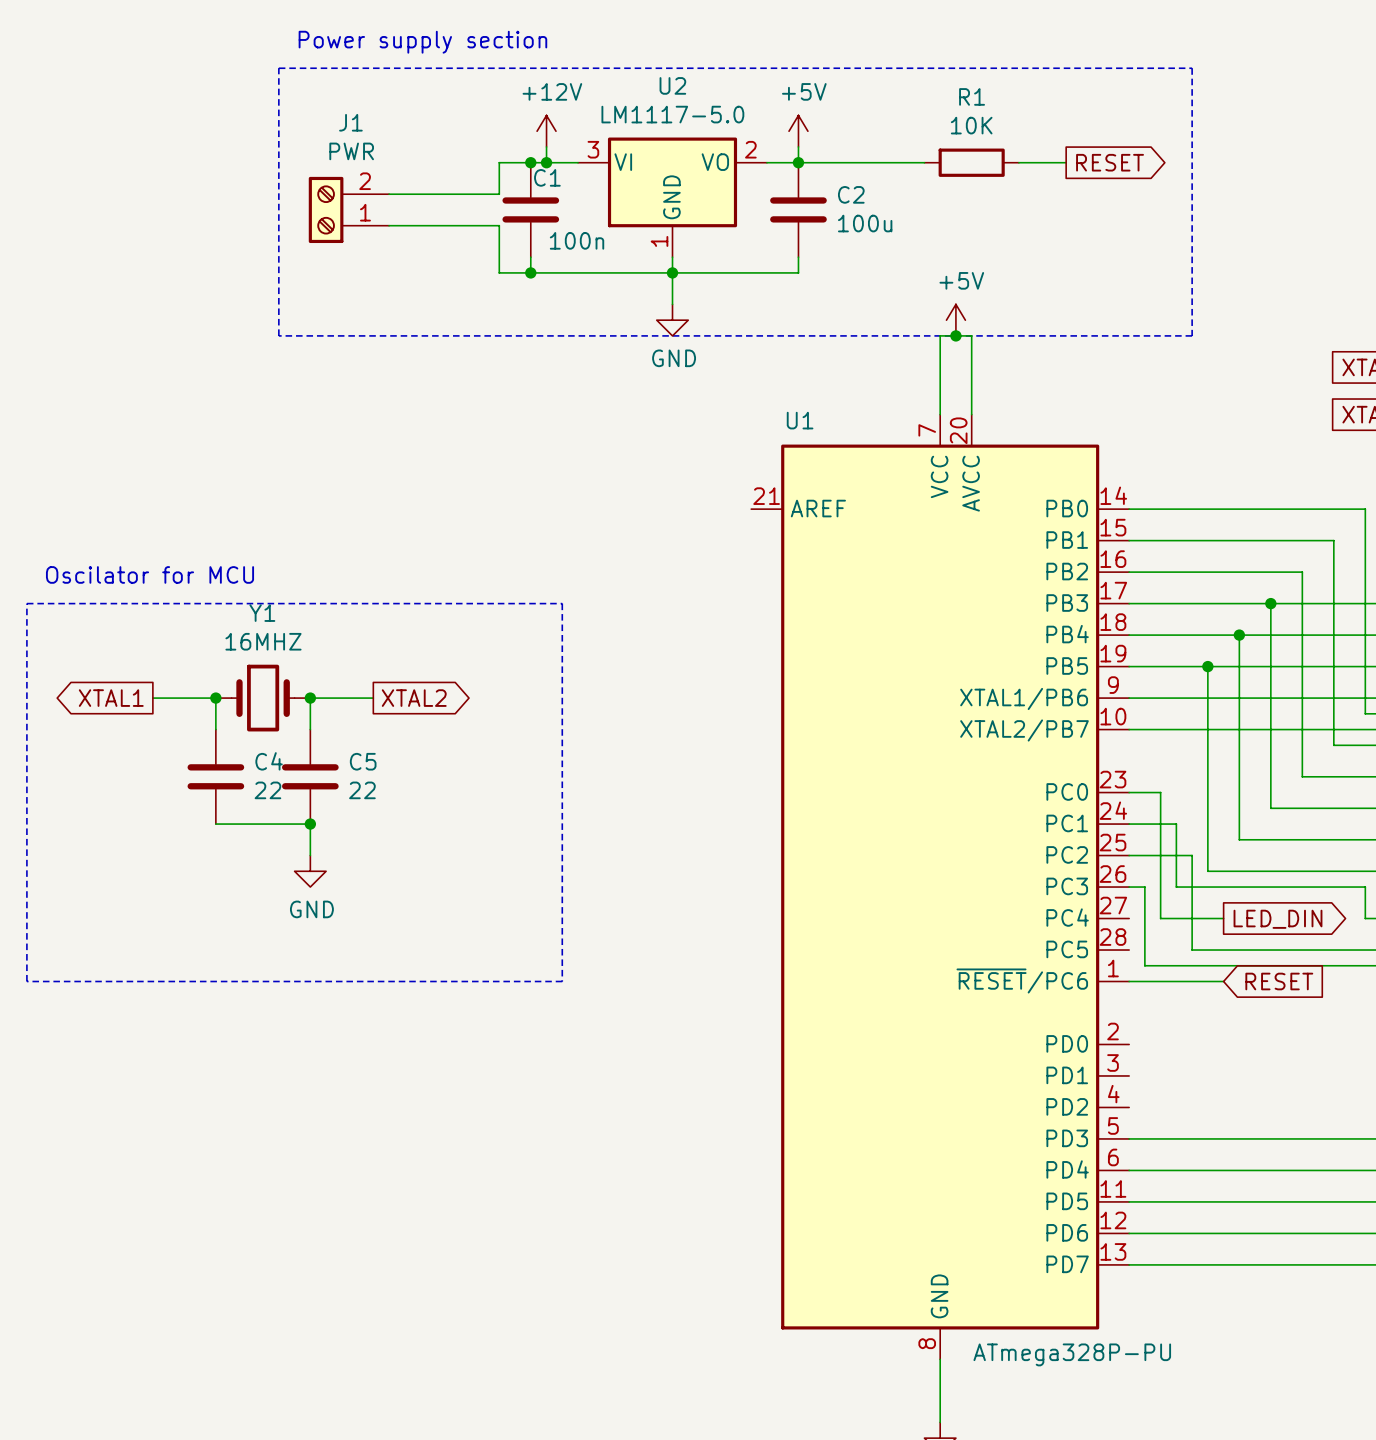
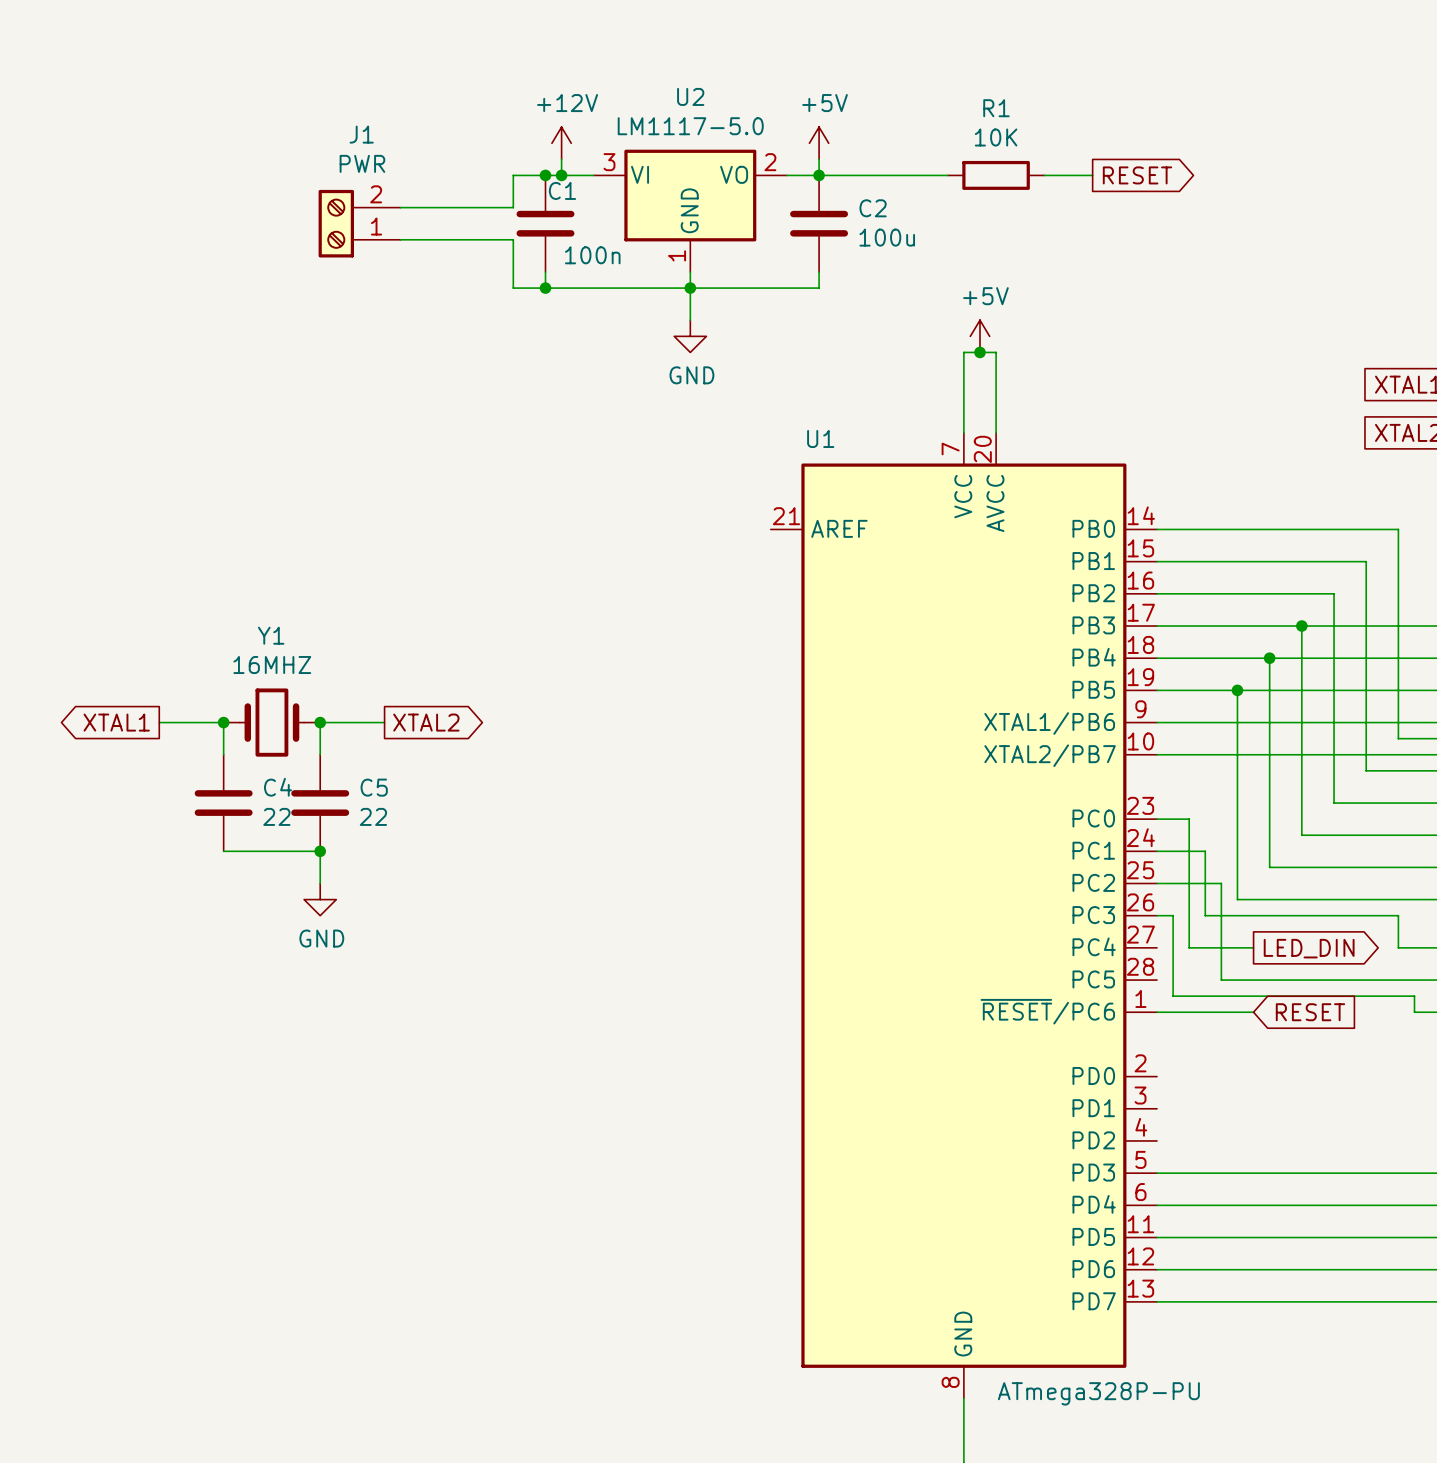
text: Power supply section (422, 42) -> none
line: (278, 68) (1192, 68) (1192, 335) (278, 335) (278, 68) -> none
text: Oscilator for MCU (150, 574) -> none
line: (26, 603) (562, 603) (562, 981) (26, 981) (26, 603) -> none

